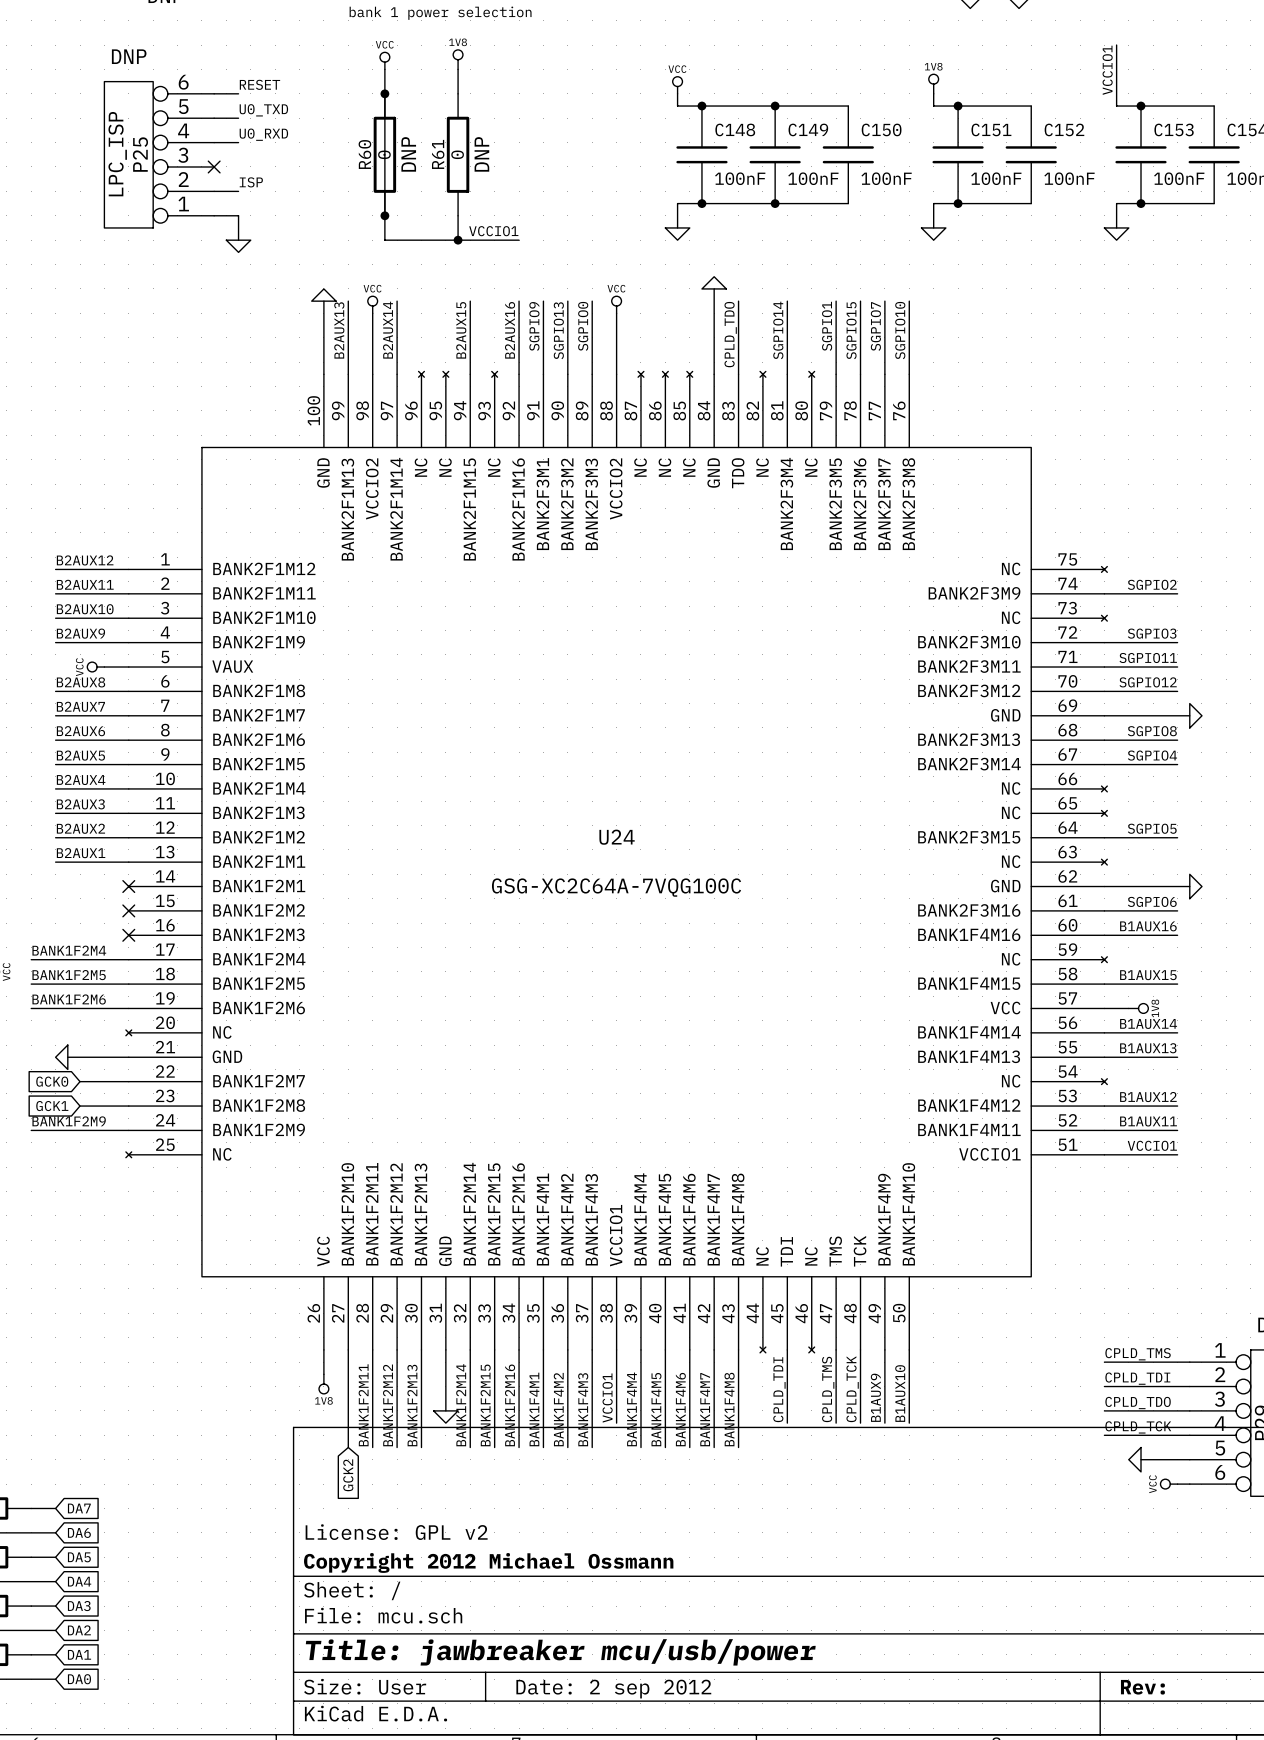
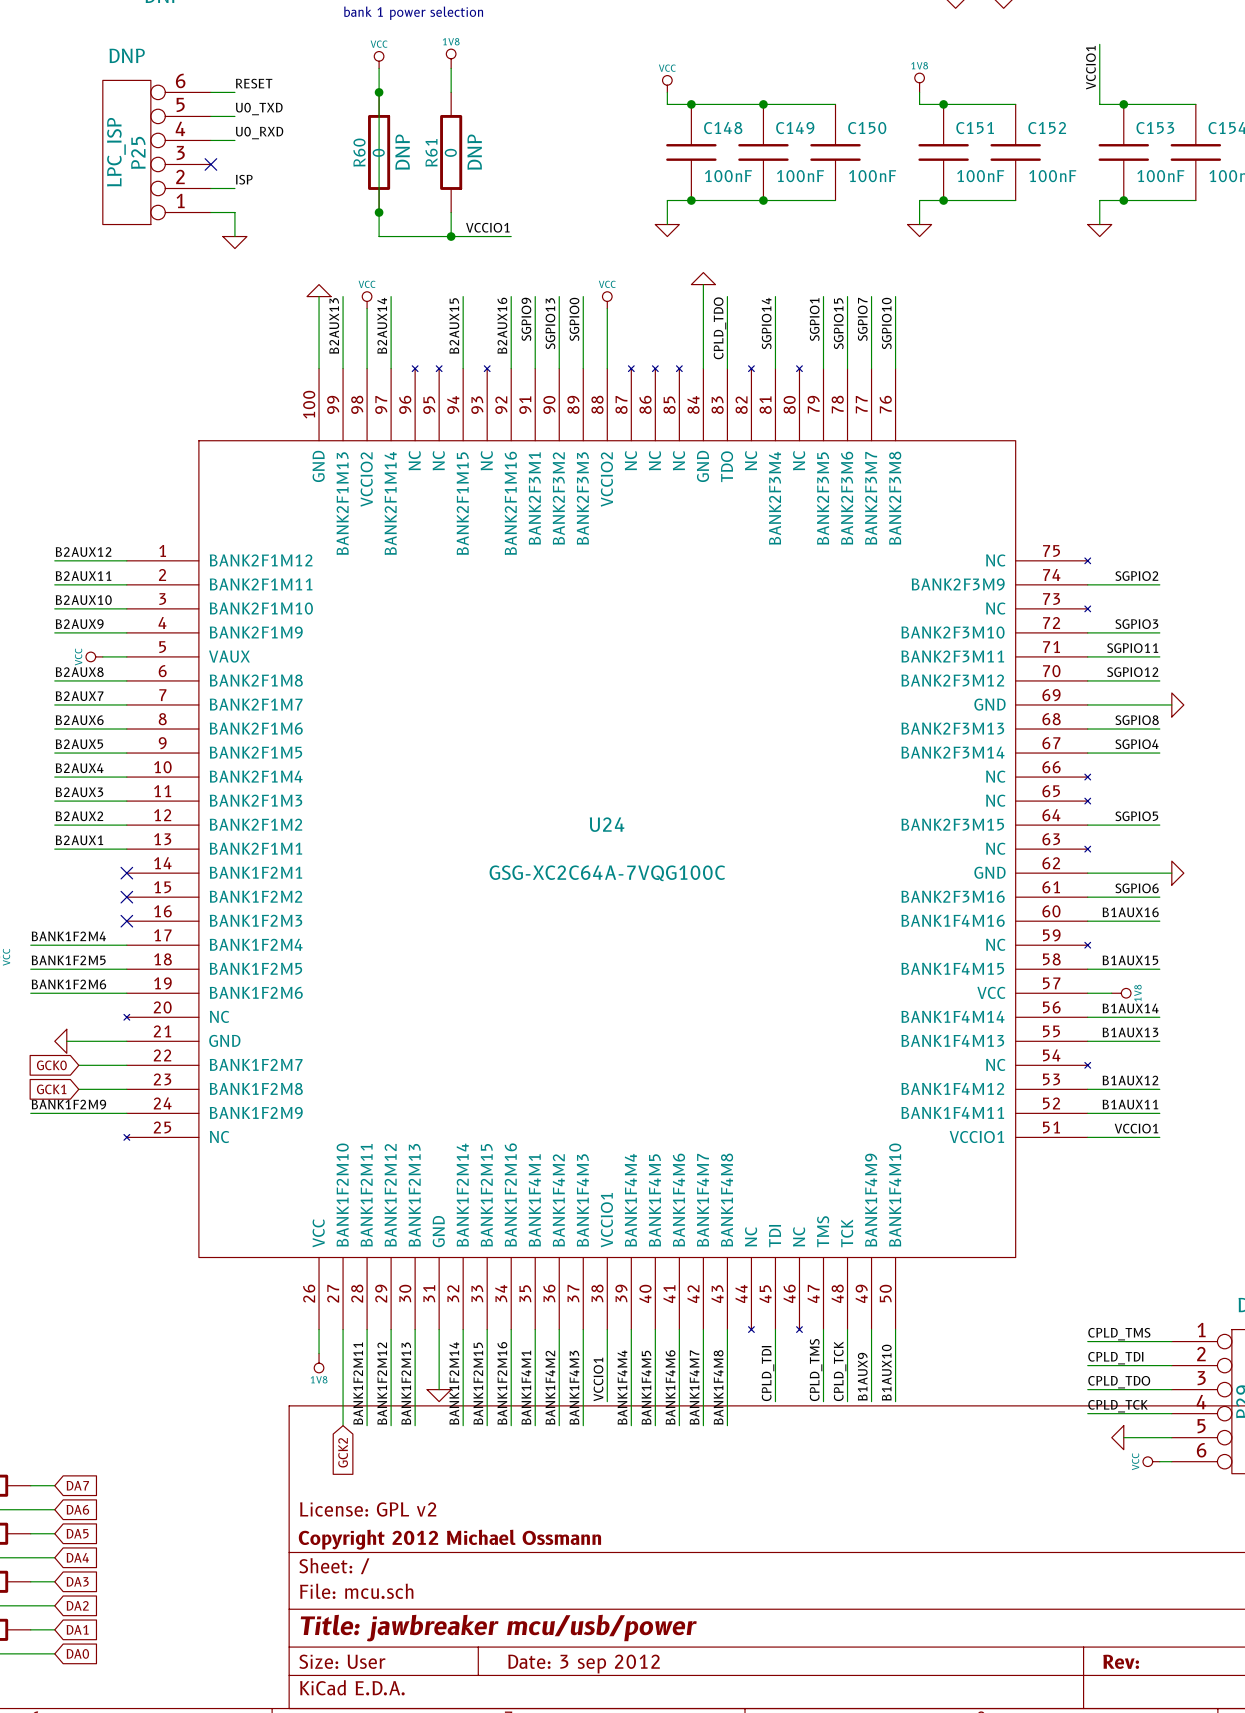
title block: Date: 2 sep 2012 (613, 1689) -> Date: 3 sep 2012 (584, 1664)

